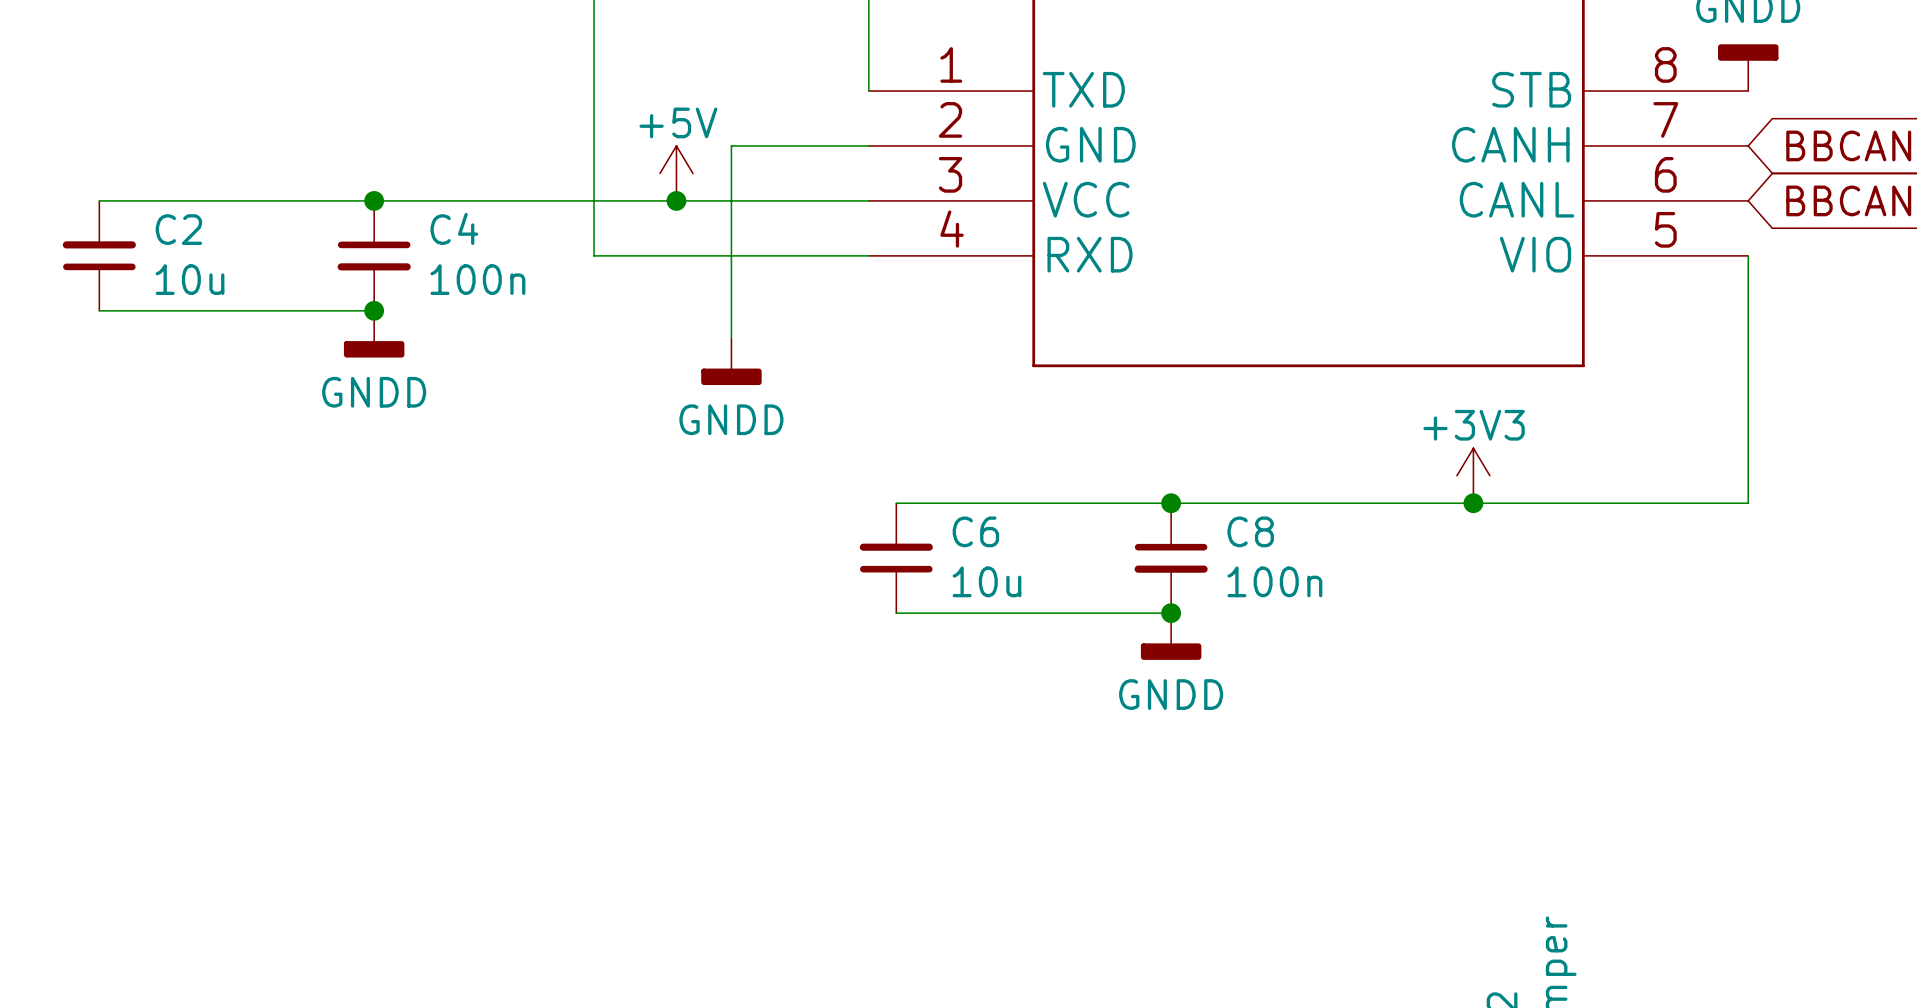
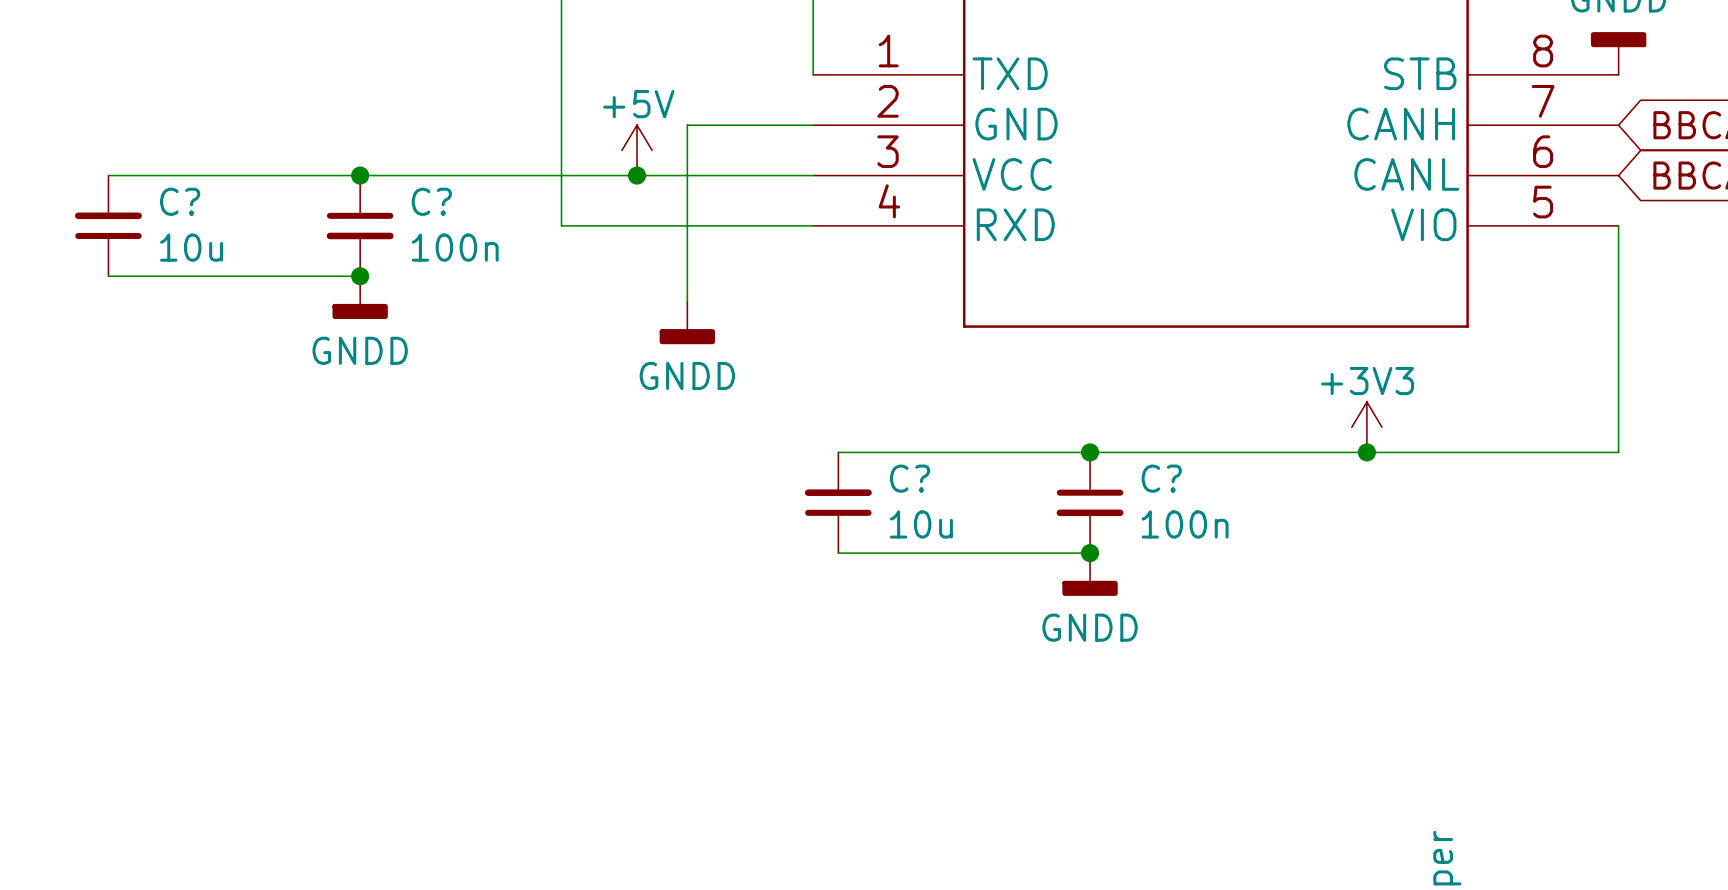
C4 name: C4 (454, 228) -> C? (431, 201)
C2 name: C2 (178, 229) -> C? (180, 201)
C6 name: C6 (975, 531) -> C? (910, 478)
C8 name: C8 (1250, 531) -> C? (1161, 478)

